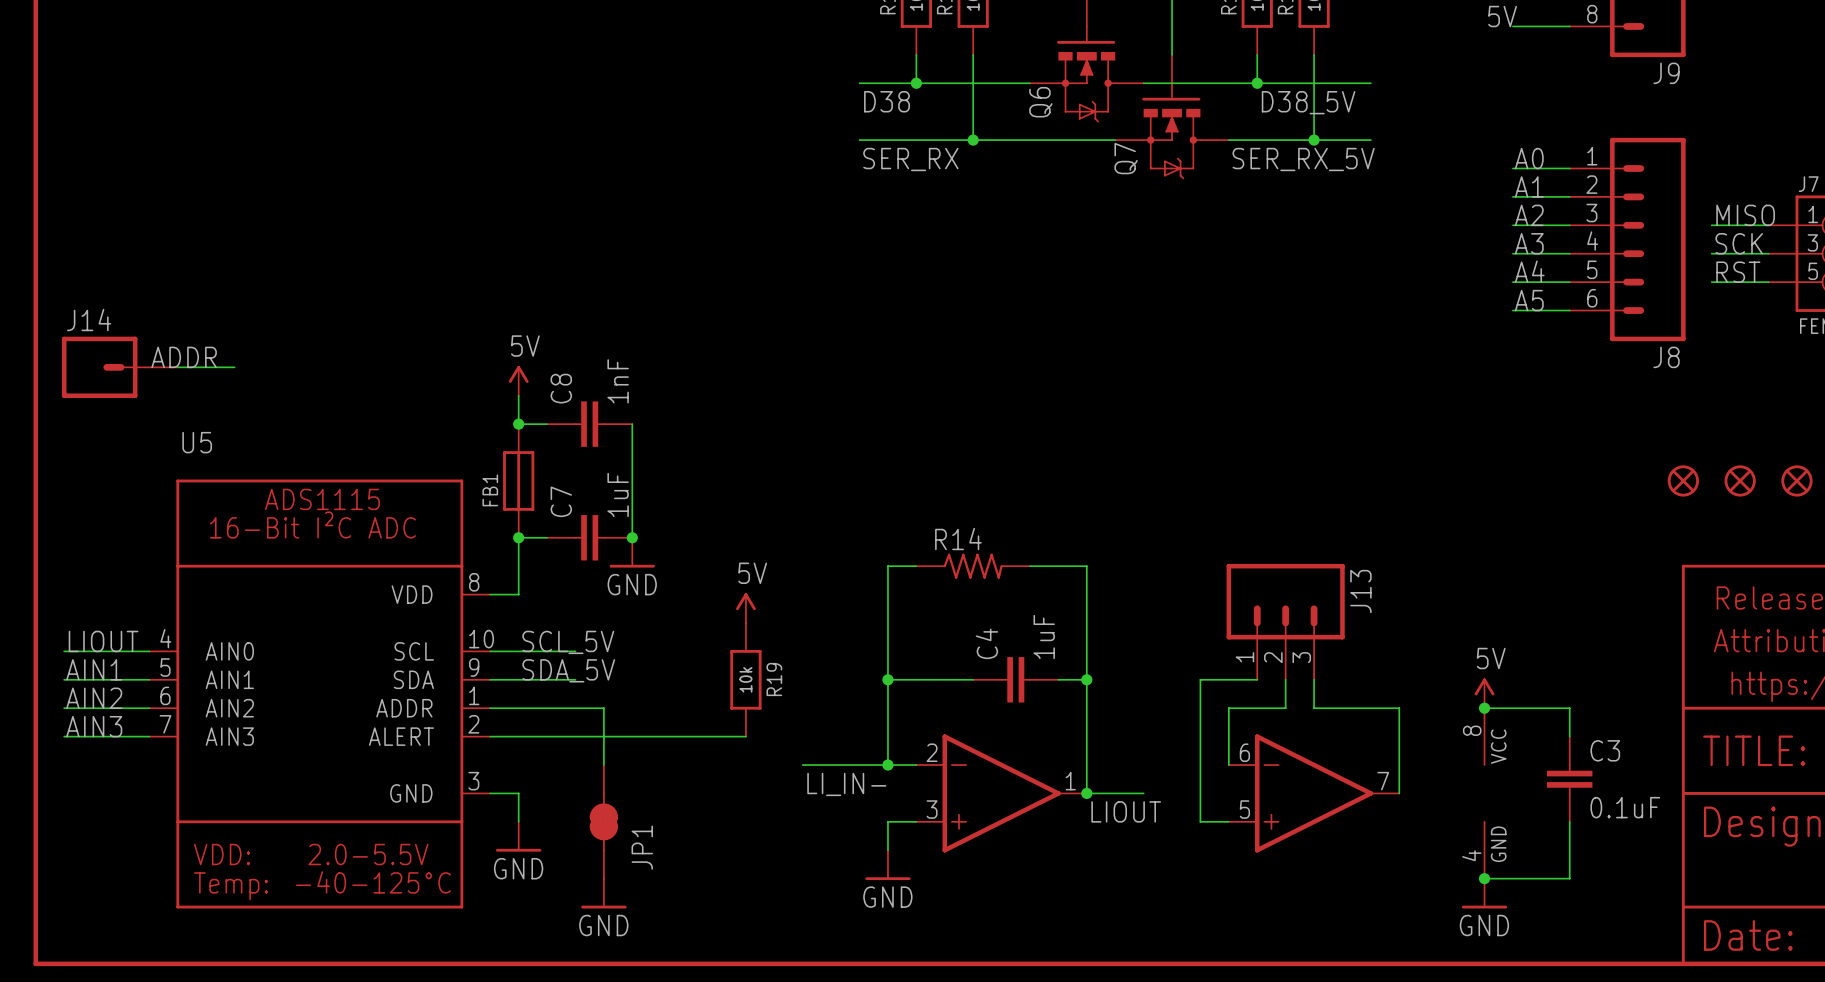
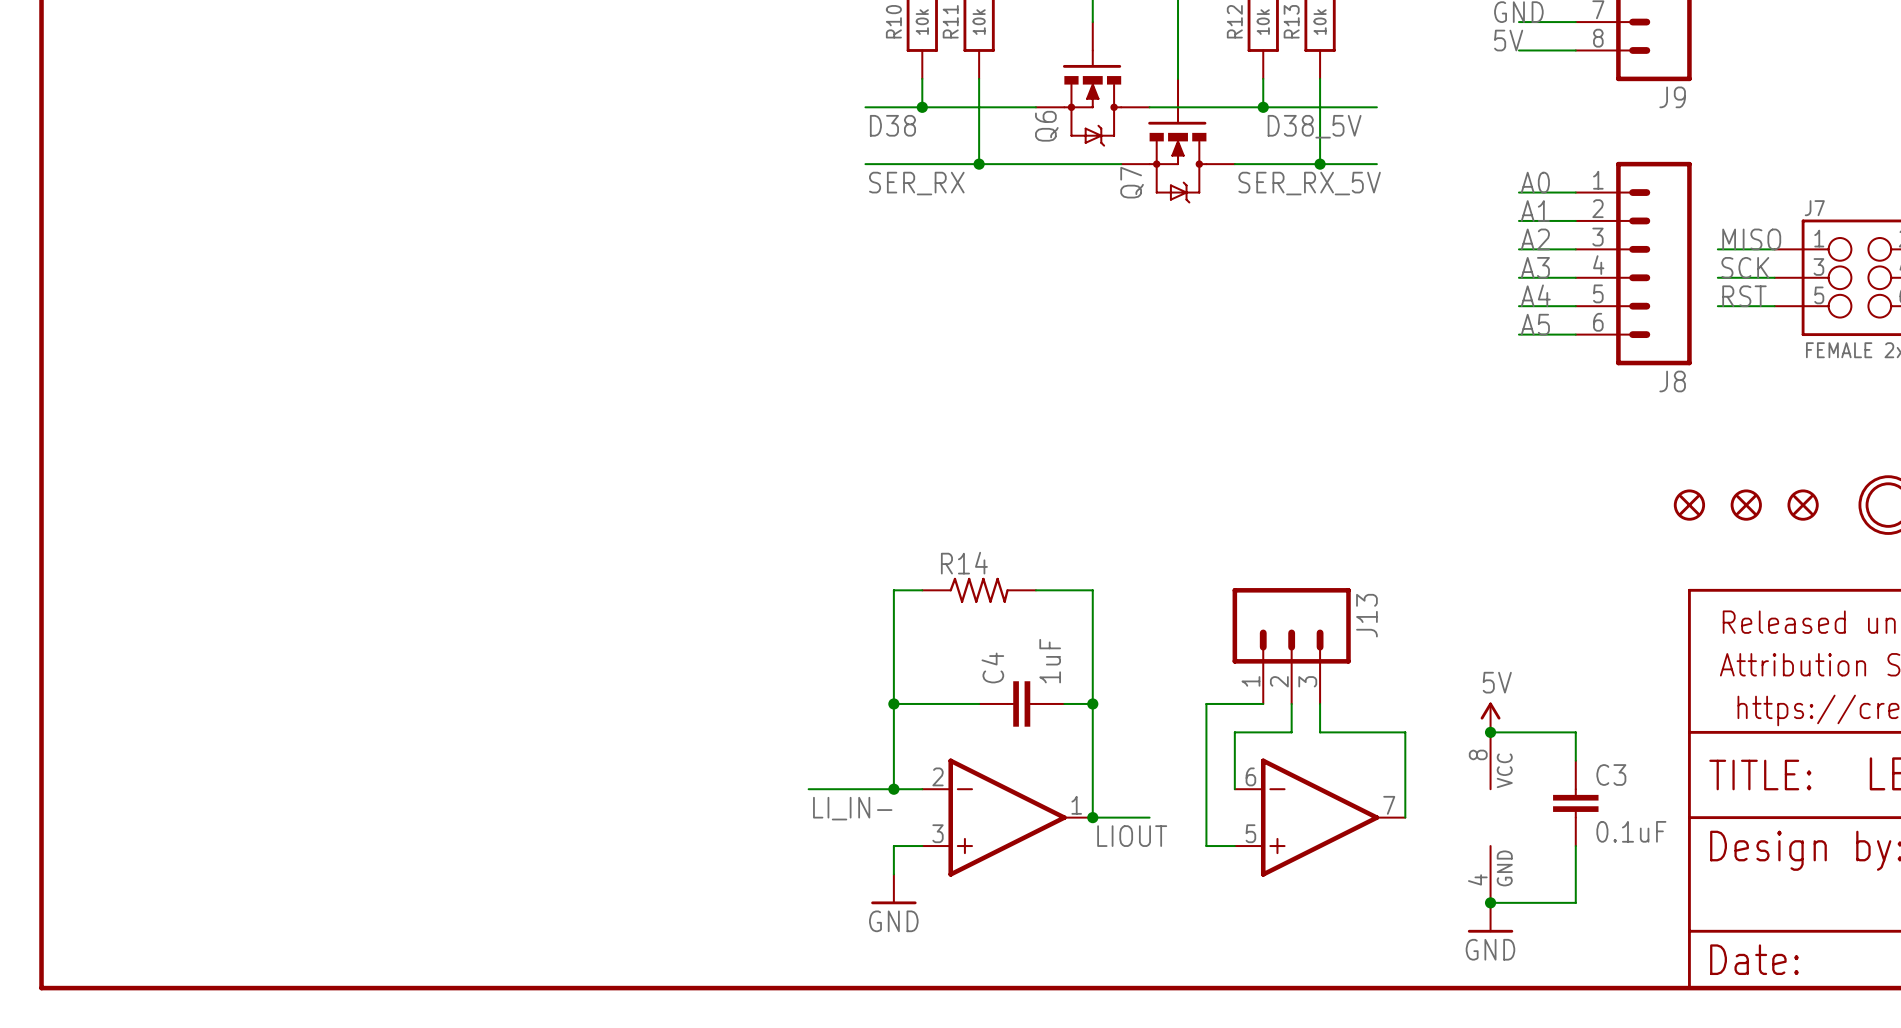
label: ADDR (184, 357) -> none
J14: (119, 367) -> none
wire: (177, 367) (234, 367) -> none
power symbol: 5V (518, 380) -> none
wire: (518, 395) (518, 424) (547, 424) -> none
junction: (518, 424) -> none
C8: 1nF (589, 424) -> none
wire: (632, 424) (632, 537) -> none
FB1: (518, 480) -> none
junction: (518, 537) -> none
wire: (547, 537) (518, 537) (518, 594) (490, 594) -> none
C7: 1uF (589, 537) -> none
junction: (632, 537) -> none
power symbol: GND (632, 552) -> none
power symbol: 5V (745, 608) -> none
label: LIOUT (103, 641) -> none
label: SCL_5V (568, 642) -> none
wire: (64, 651) (149, 651) -> none
wire: (490, 651) (575, 651) -> none
label: AIN1 (94, 669) -> none
label: SDA_5V (568, 670) -> none
wire: (64, 679) (149, 679) -> none
wire: (490, 679) (575, 679) -> none
R19: 10k (745, 679) -> none
U5: (319, 694) -> none
label: AIN2 (94, 698) -> none
wire: (64, 708) (149, 708) -> none
wire: (490, 708) (603, 708) (603, 765) -> none
label: AIN3 (94, 726) -> none
wire: (64, 736) (149, 736) -> none
wire: (490, 736) (745, 736) -> none
wire: (490, 793) (518, 793) (518, 821) -> none
JP1: (603, 821) -> none
power symbol: GND (518, 836) -> none
power symbol: GND (603, 893) -> none

